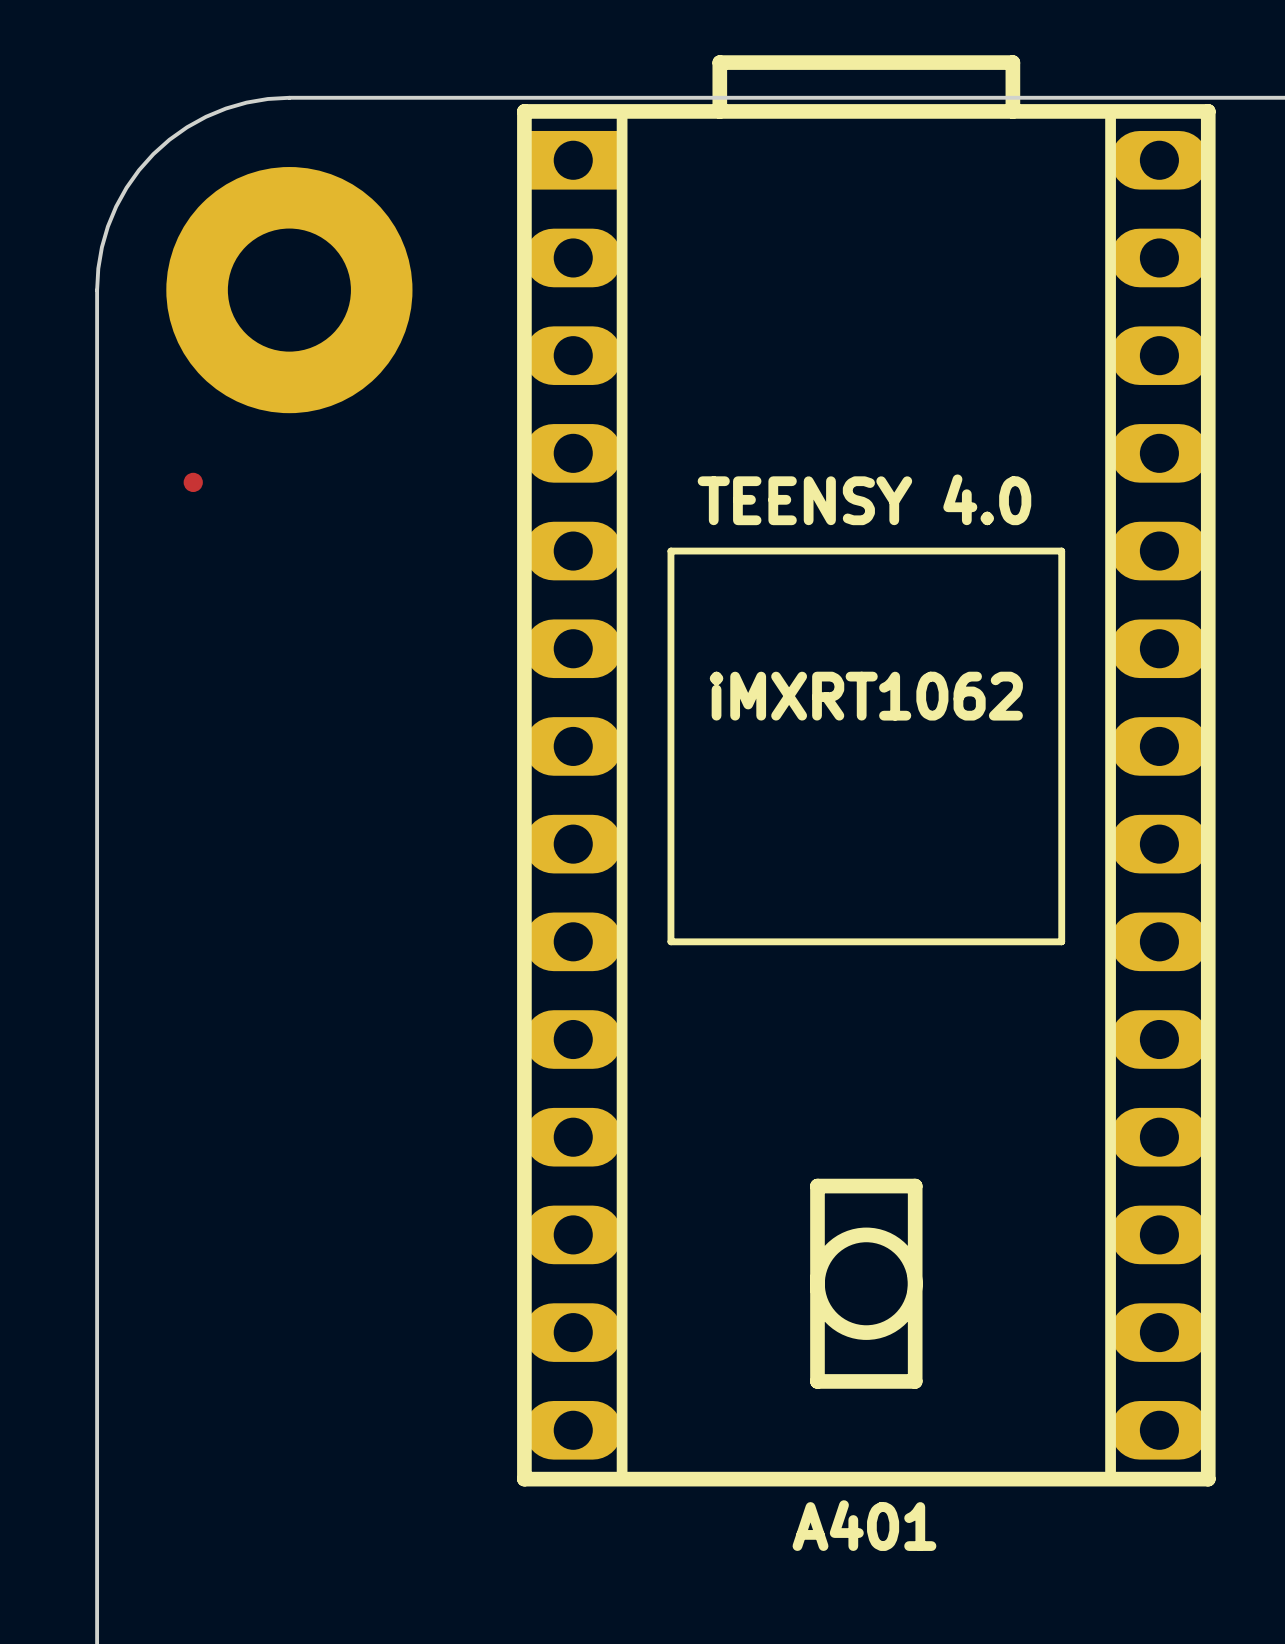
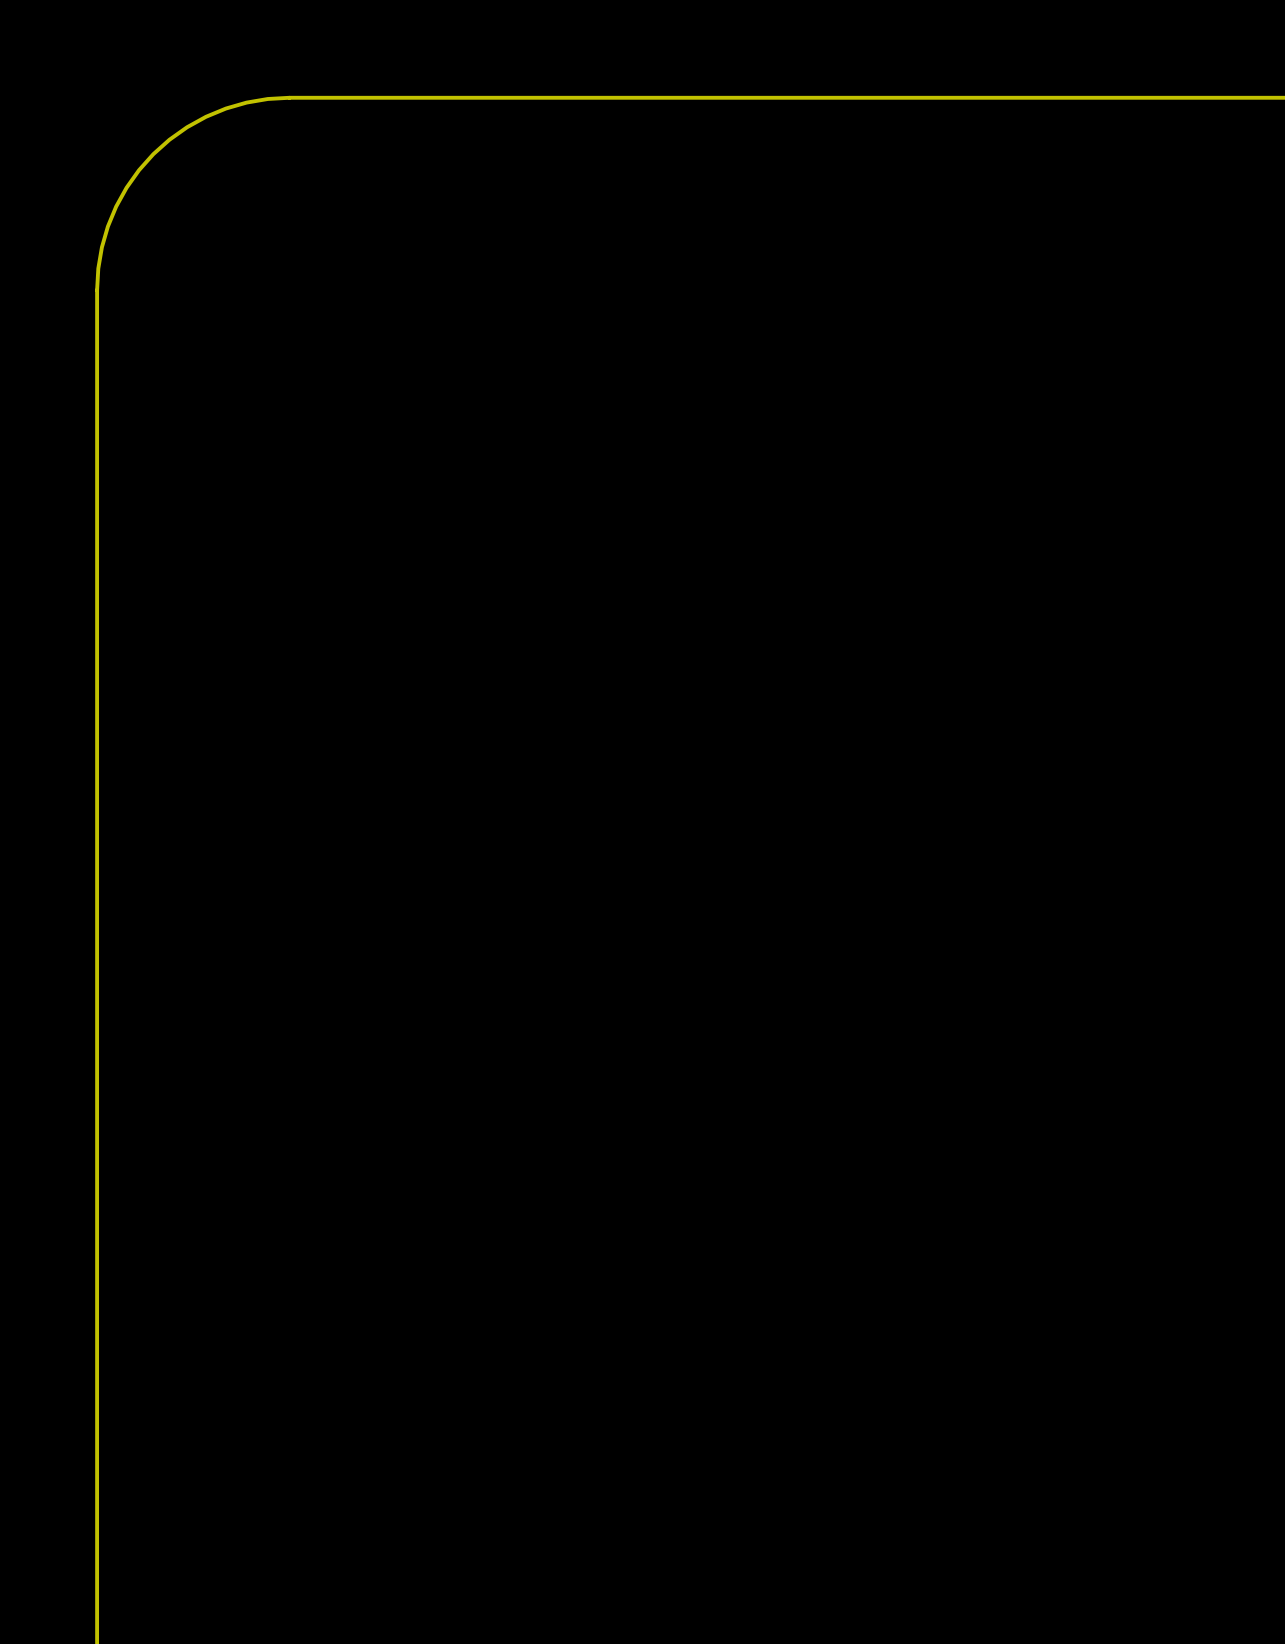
part: (289, 290) -> none
part: (193, 482) -> none
A401: (866, 770) -> none

